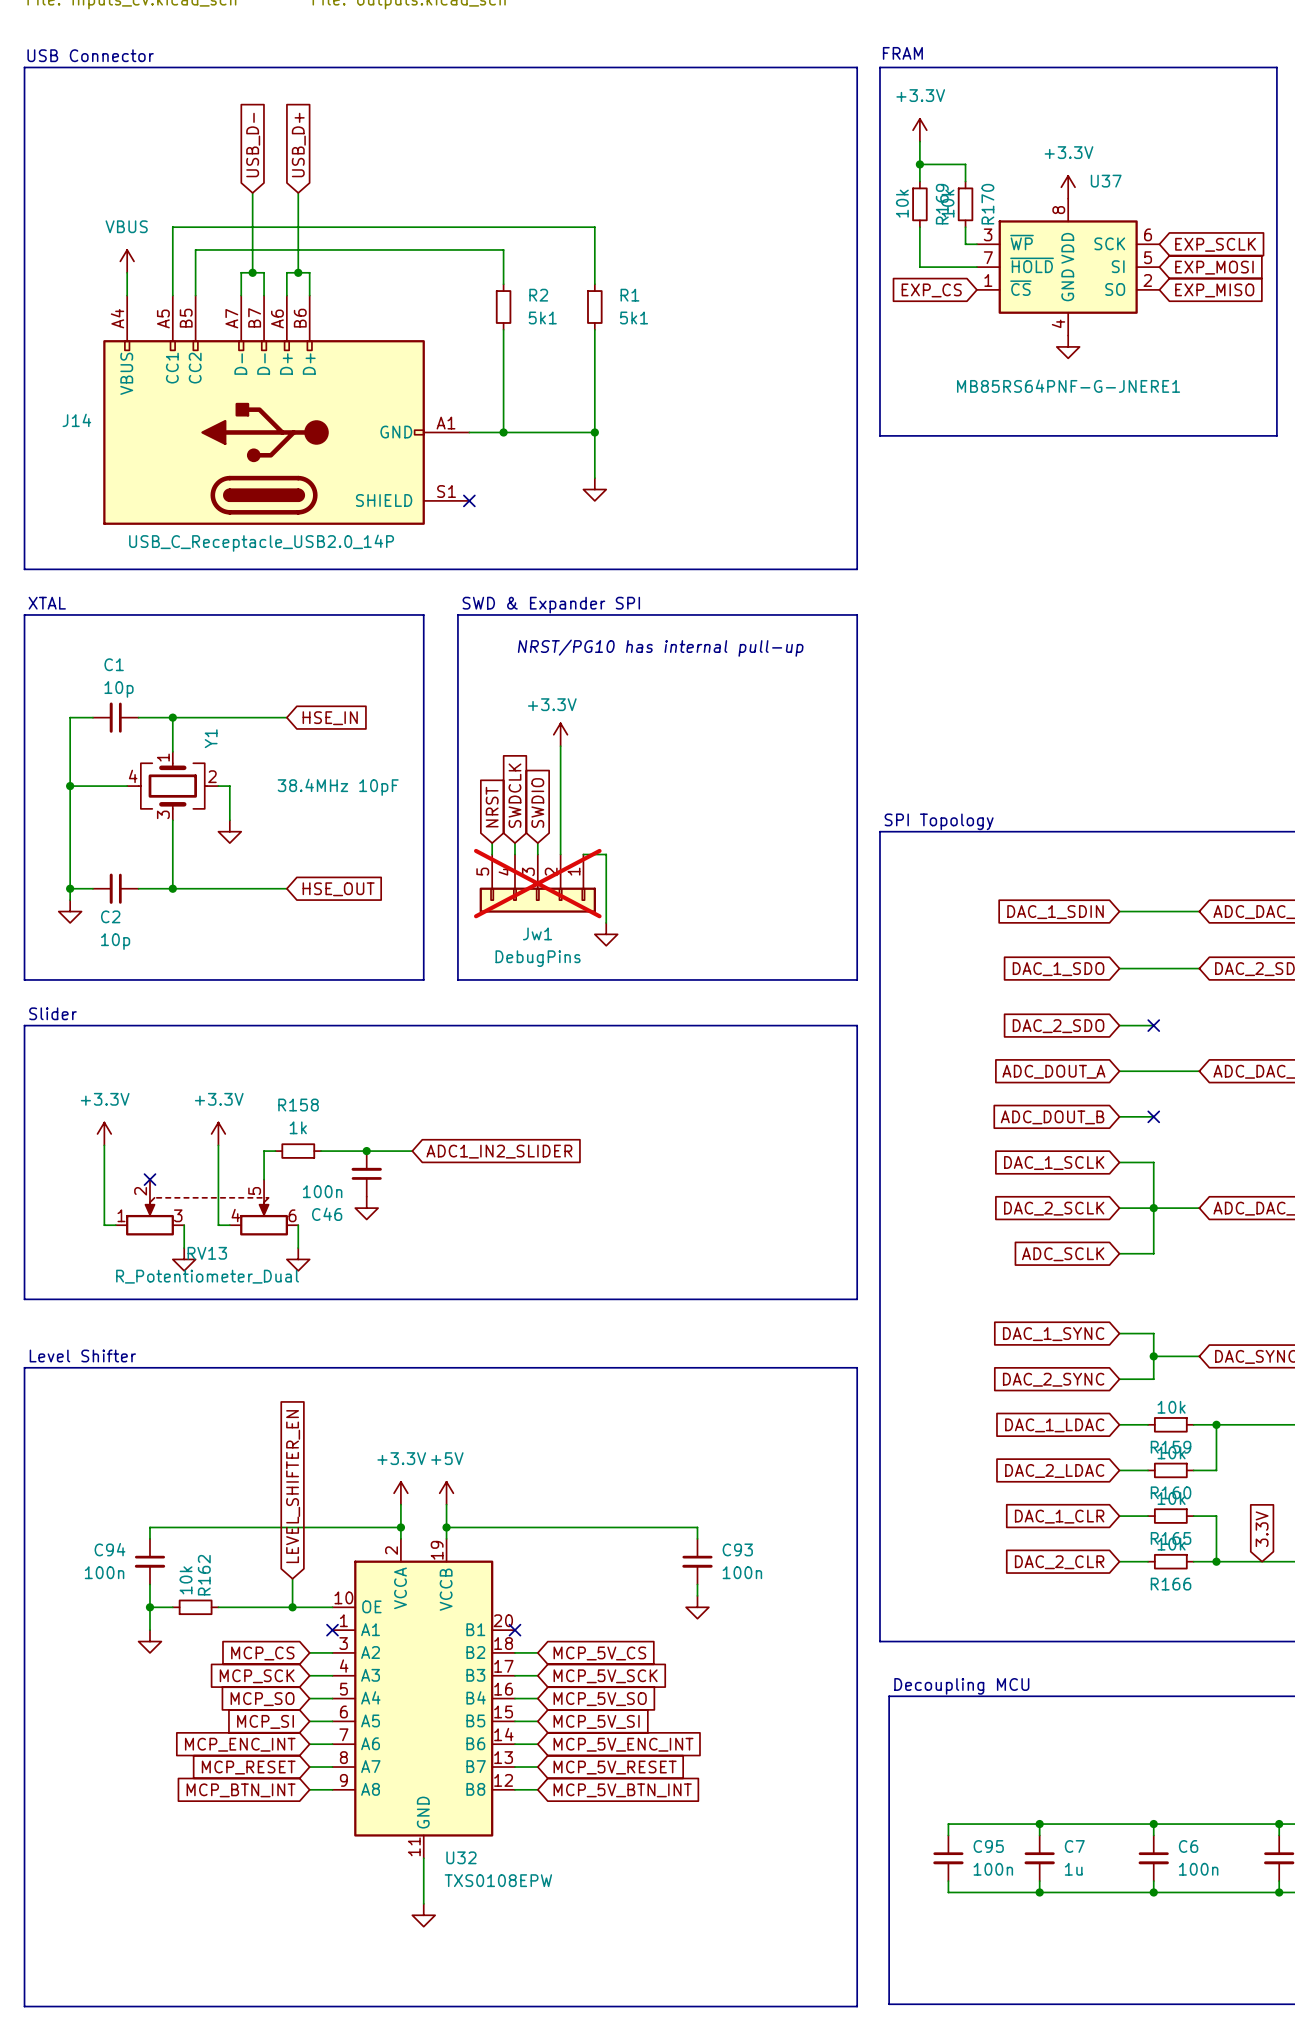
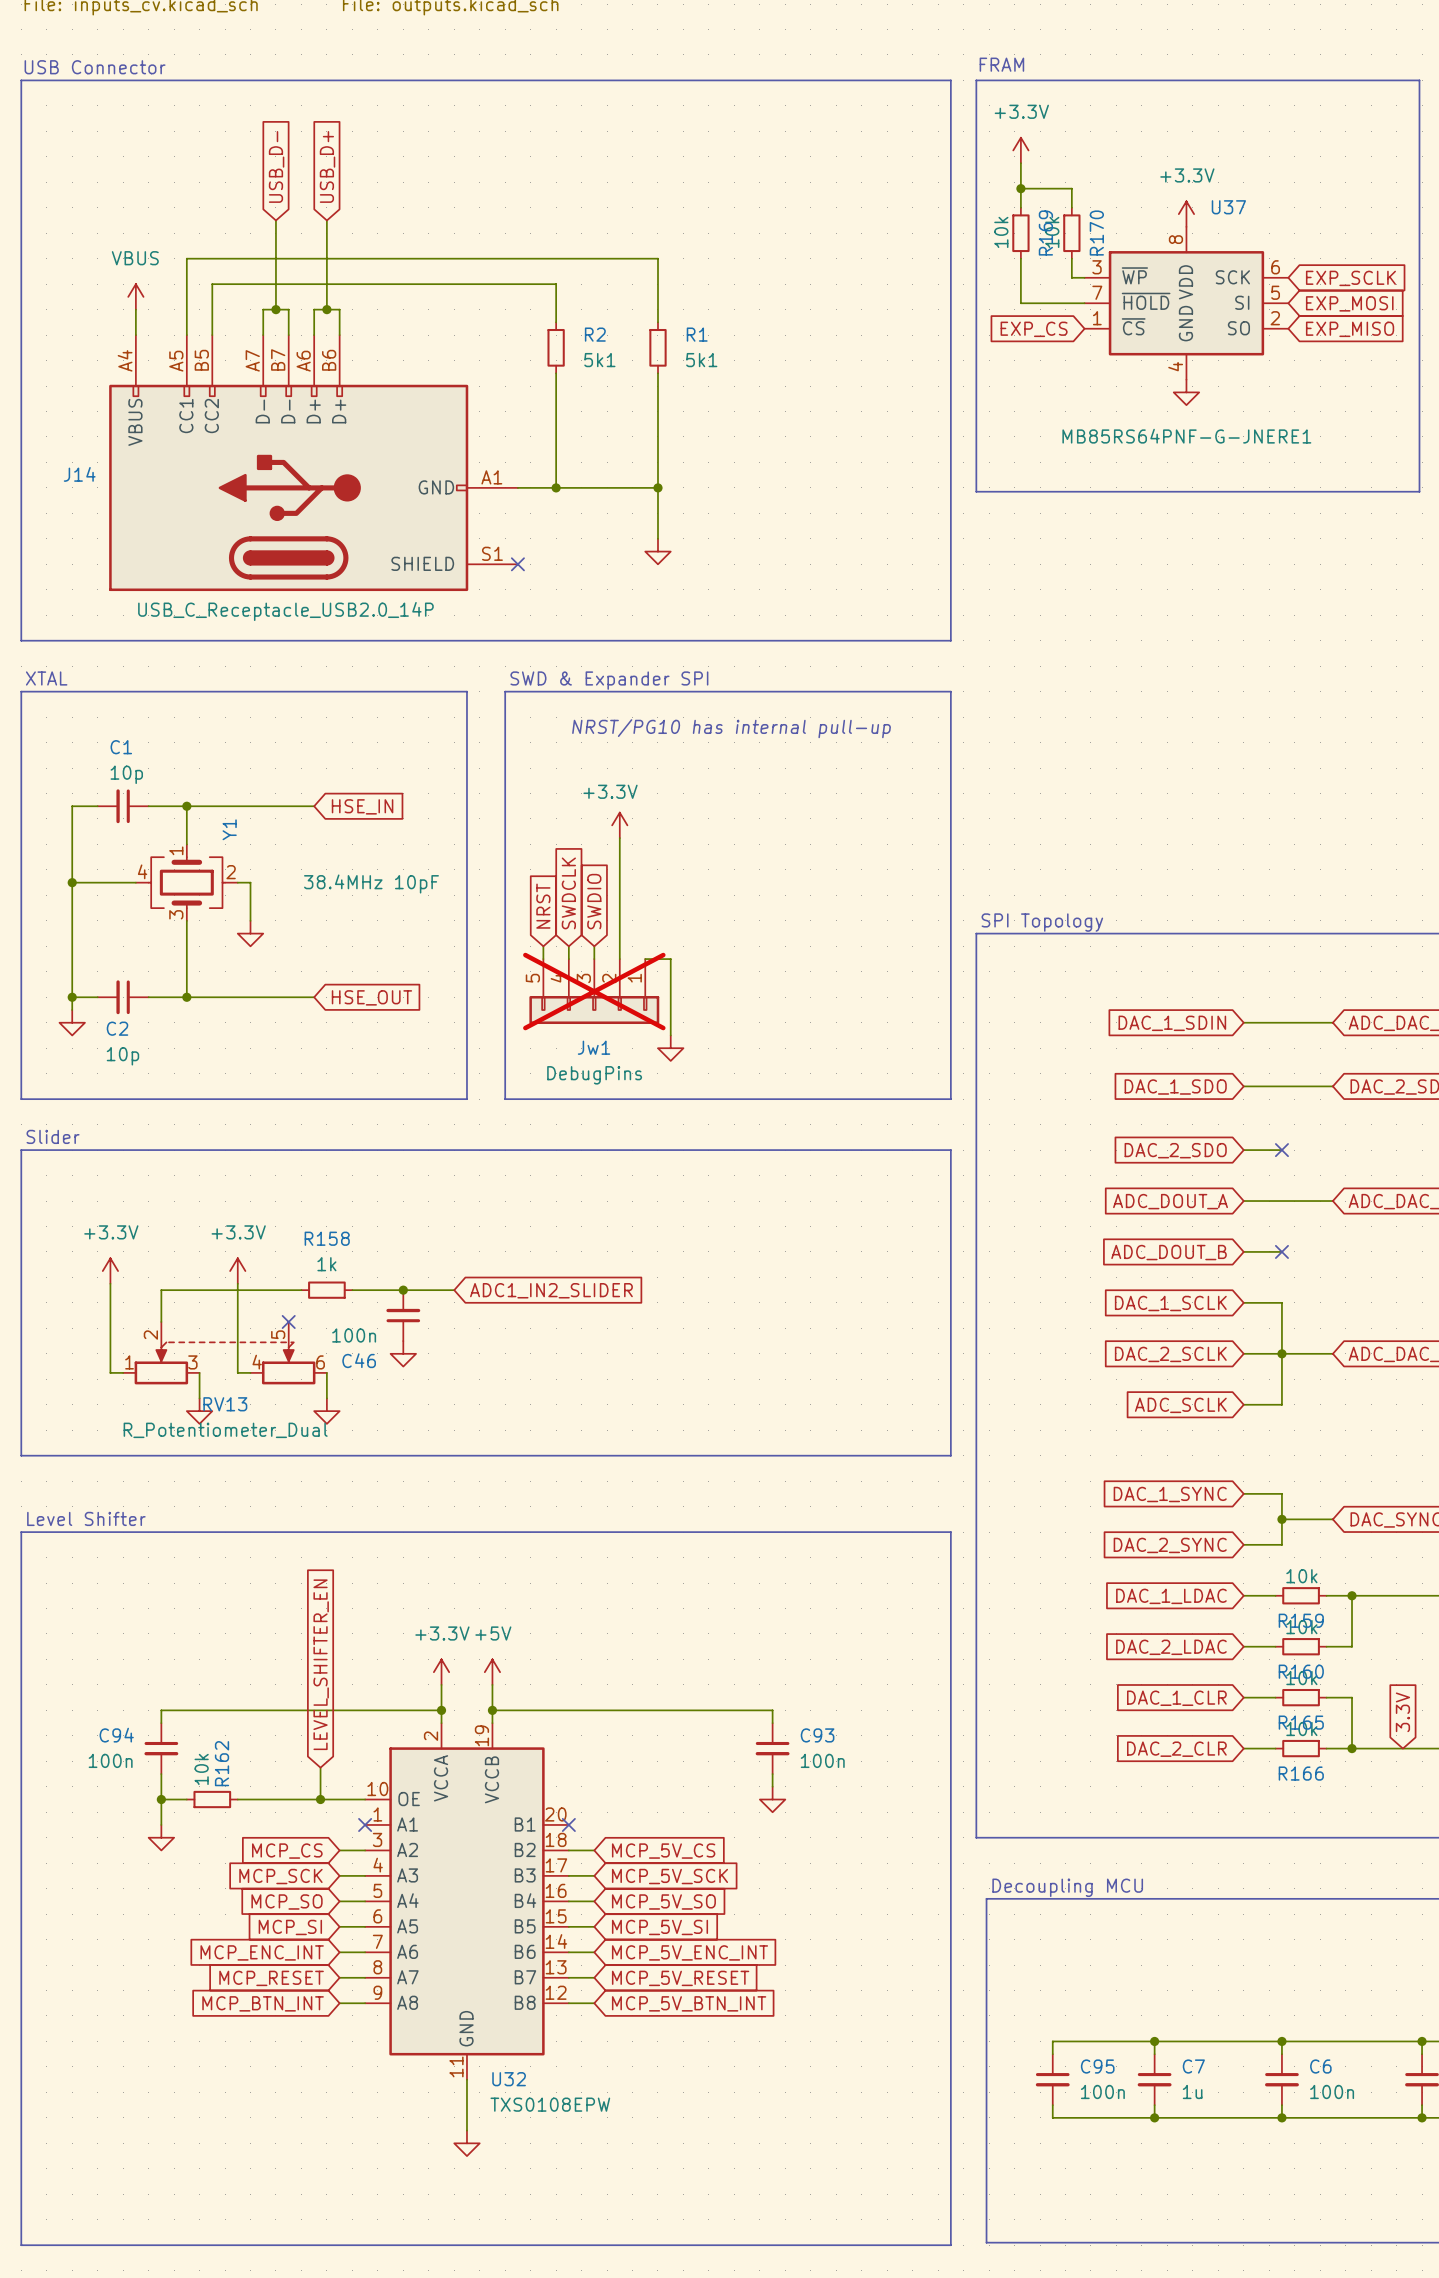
wire: (264, 1151) (264, 1179) -> (288, 1290) (161, 1290) (161, 1321)
no-connect mark: (149, 1179) -> none
no-connect mark: none -> (288, 1321)

